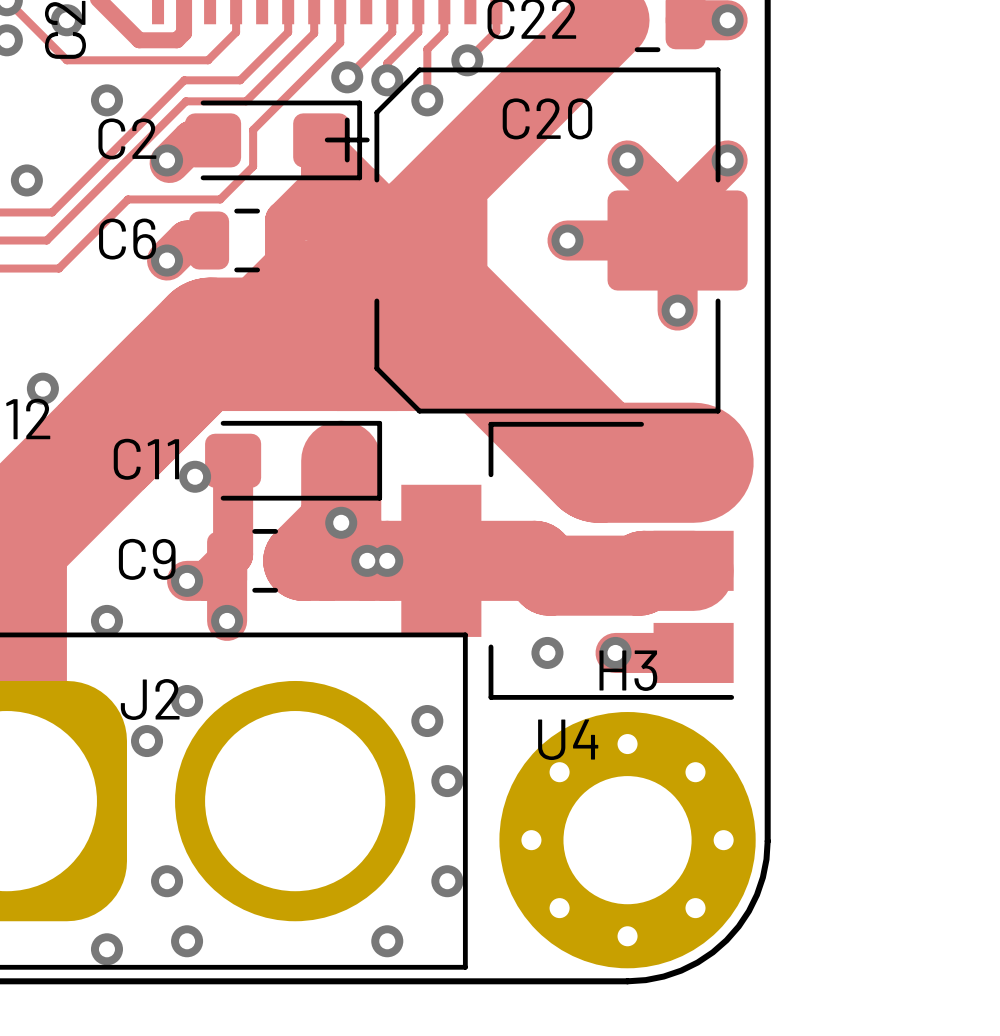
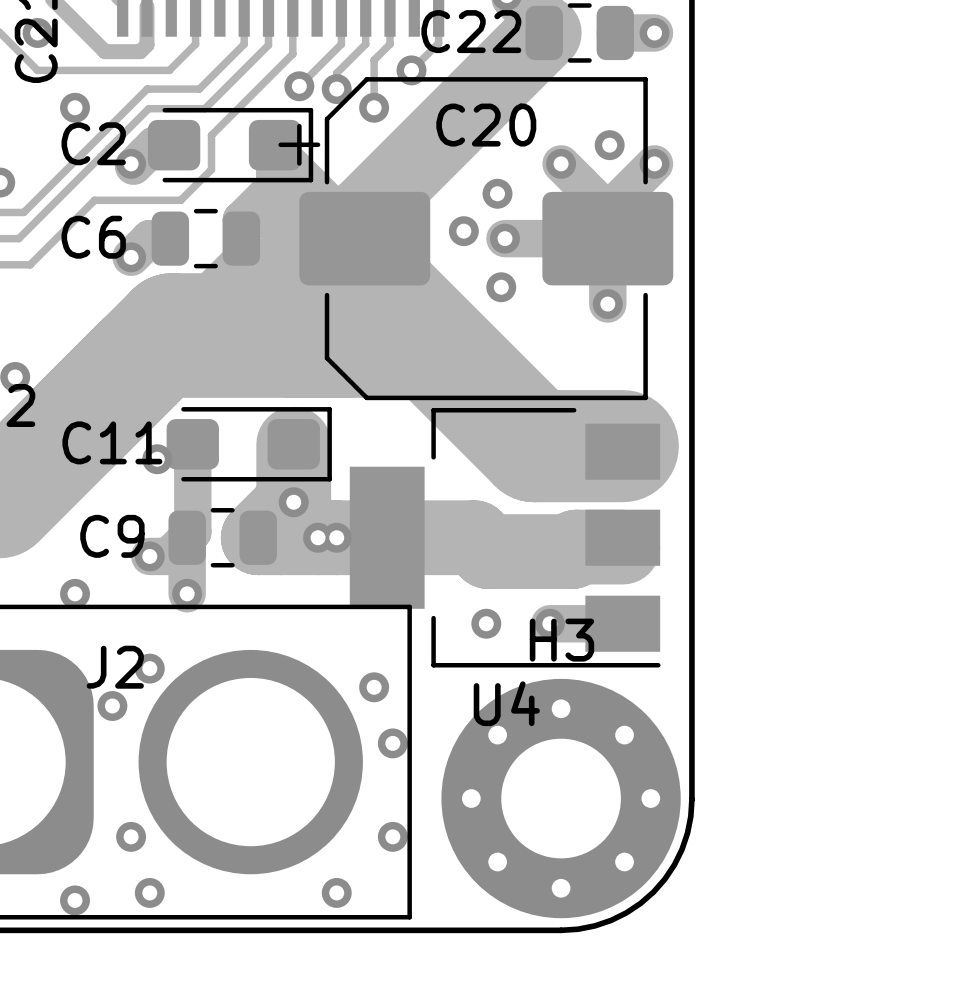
via: none -> (609, 145)
via: none -> (497, 193)
via: none -> (463, 231)
via: none -> (501, 287)

